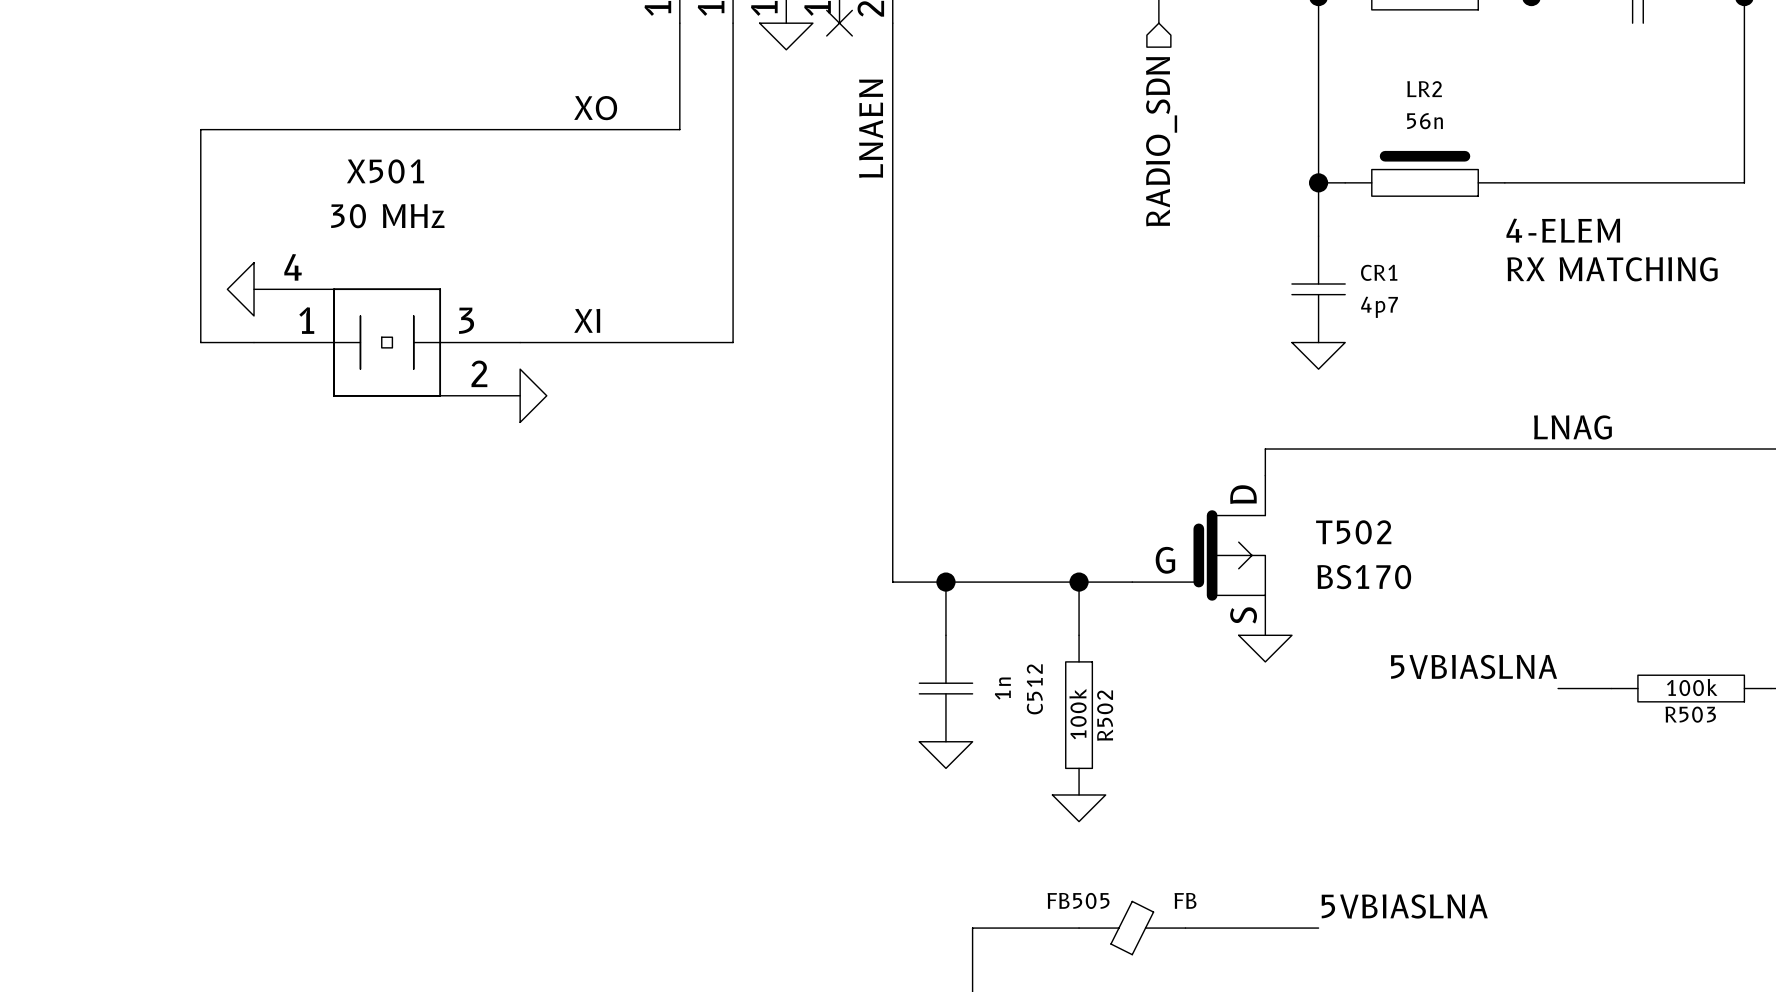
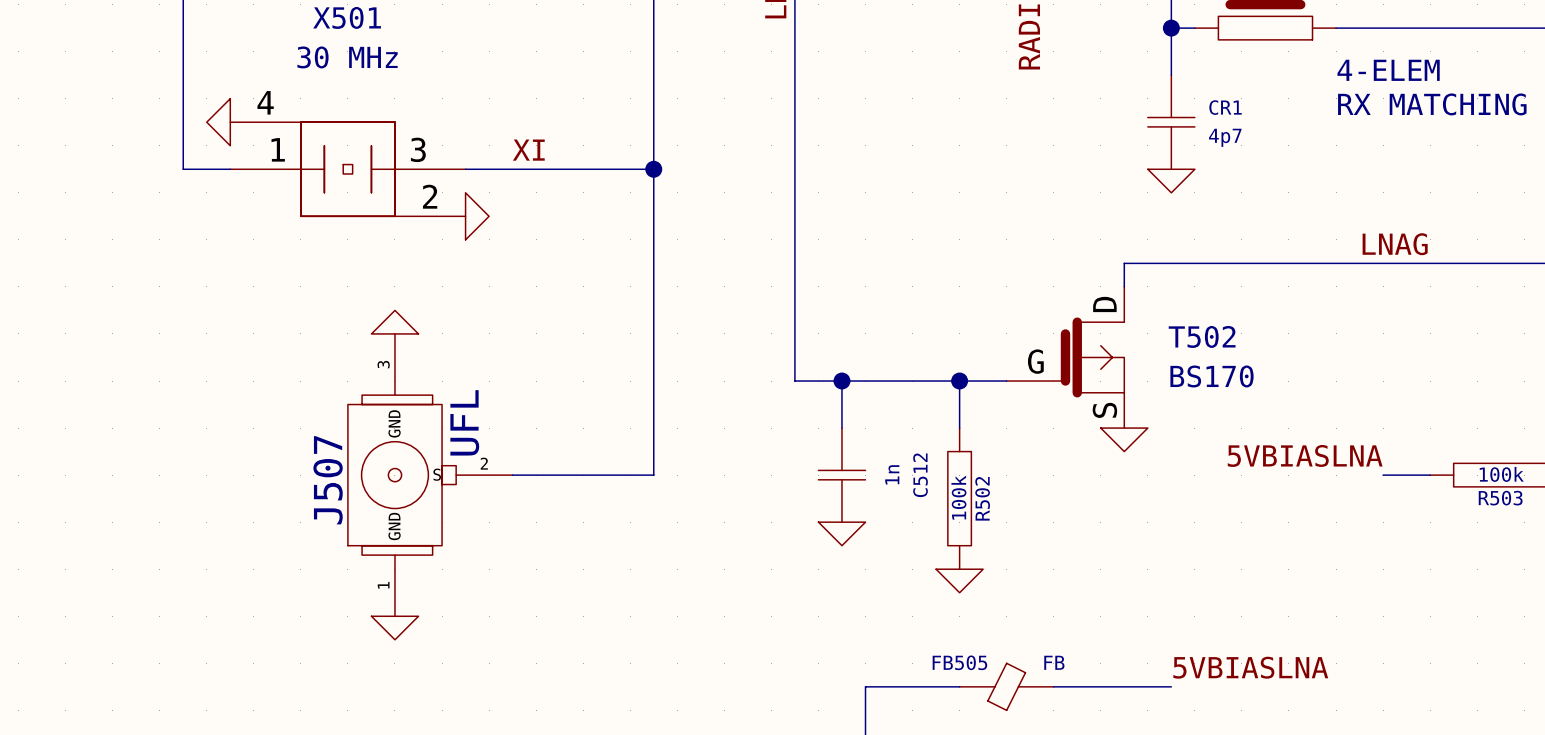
wire: none -> (653, 169) (653, 475) (512, 475)
junction: none -> (653, 169)
power symbol: none -> (394, 322)
J507: none -> UFL (430, 475)
power symbol: none -> (394, 628)

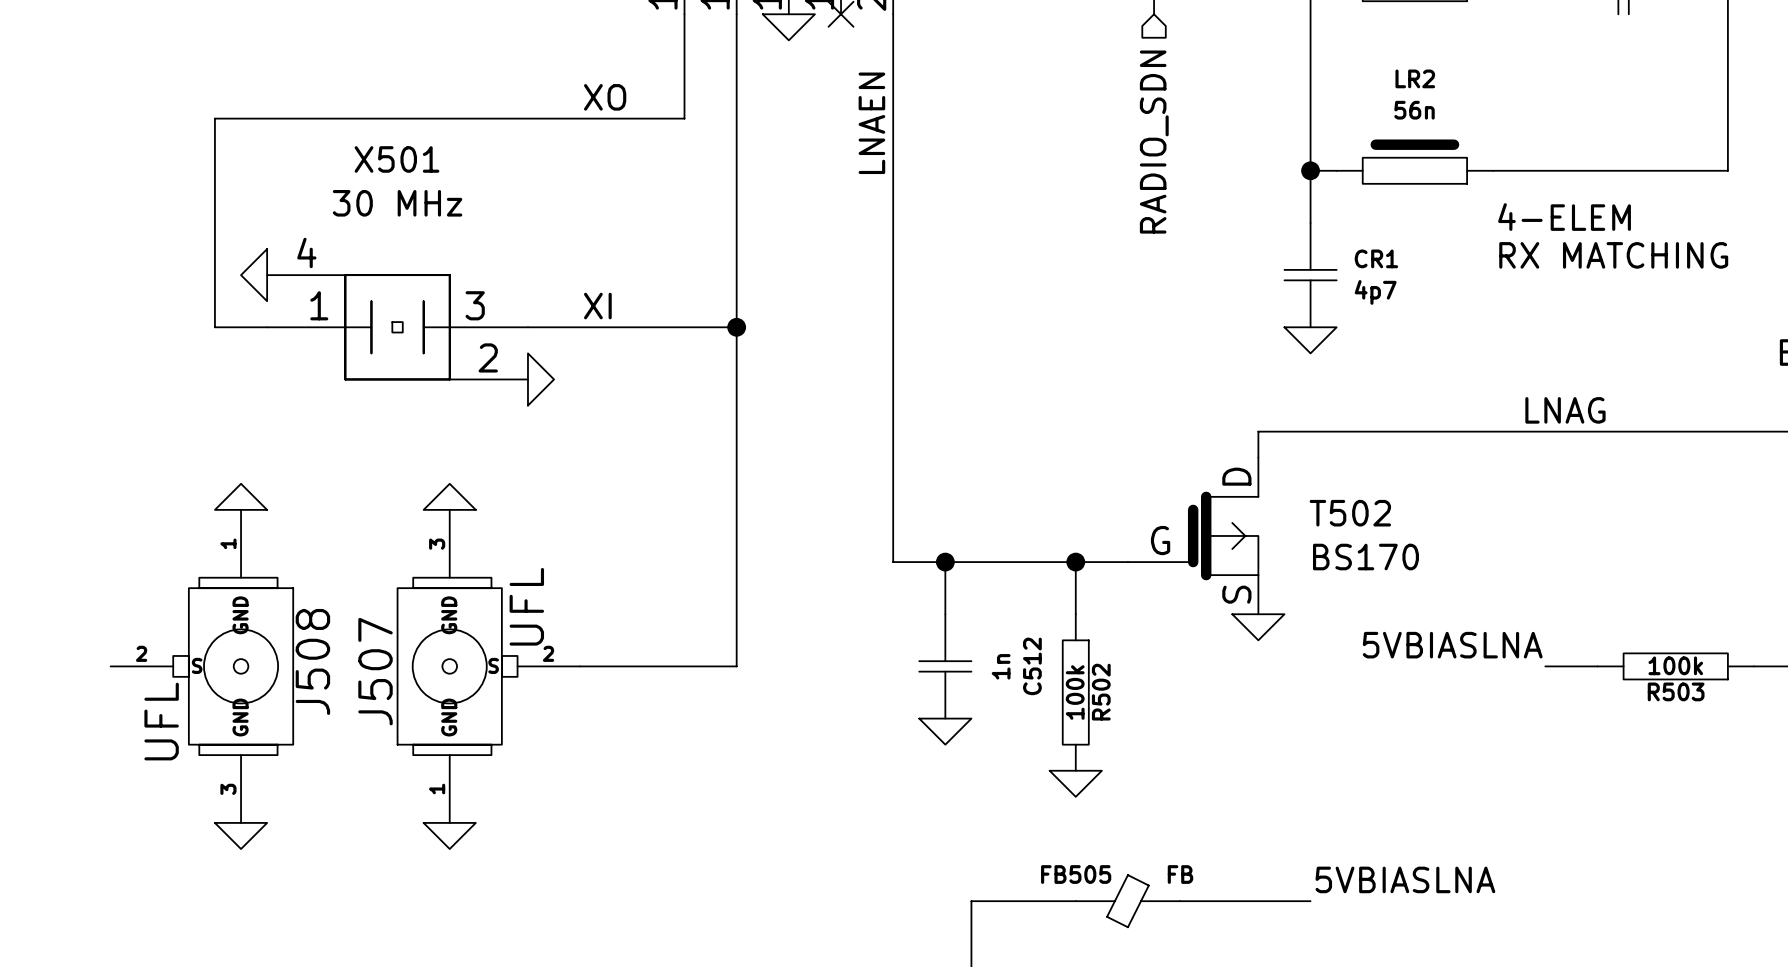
power symbol: none -> (241, 496)
J508: none -> UFL (201, 666)
power symbol: none -> (241, 835)

